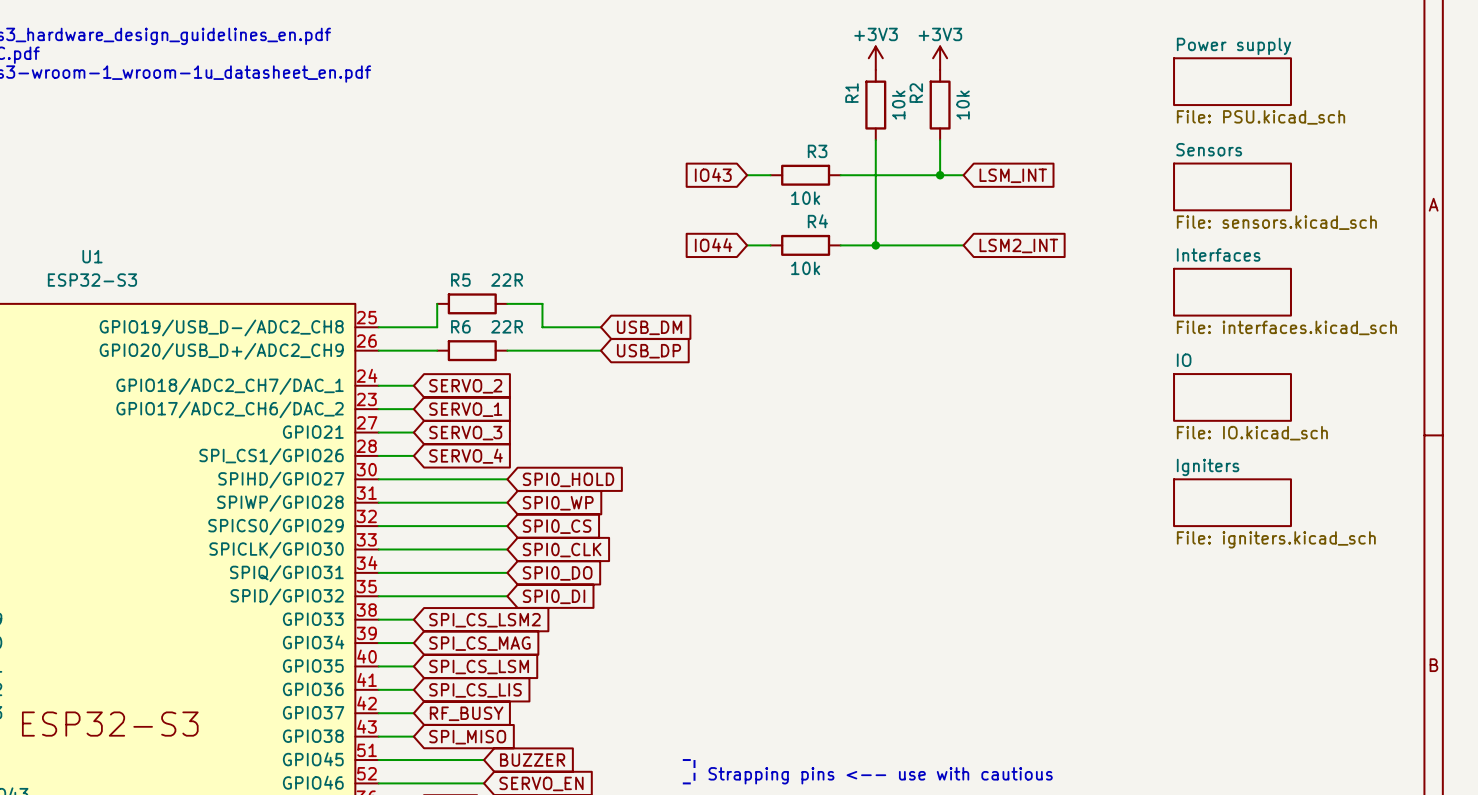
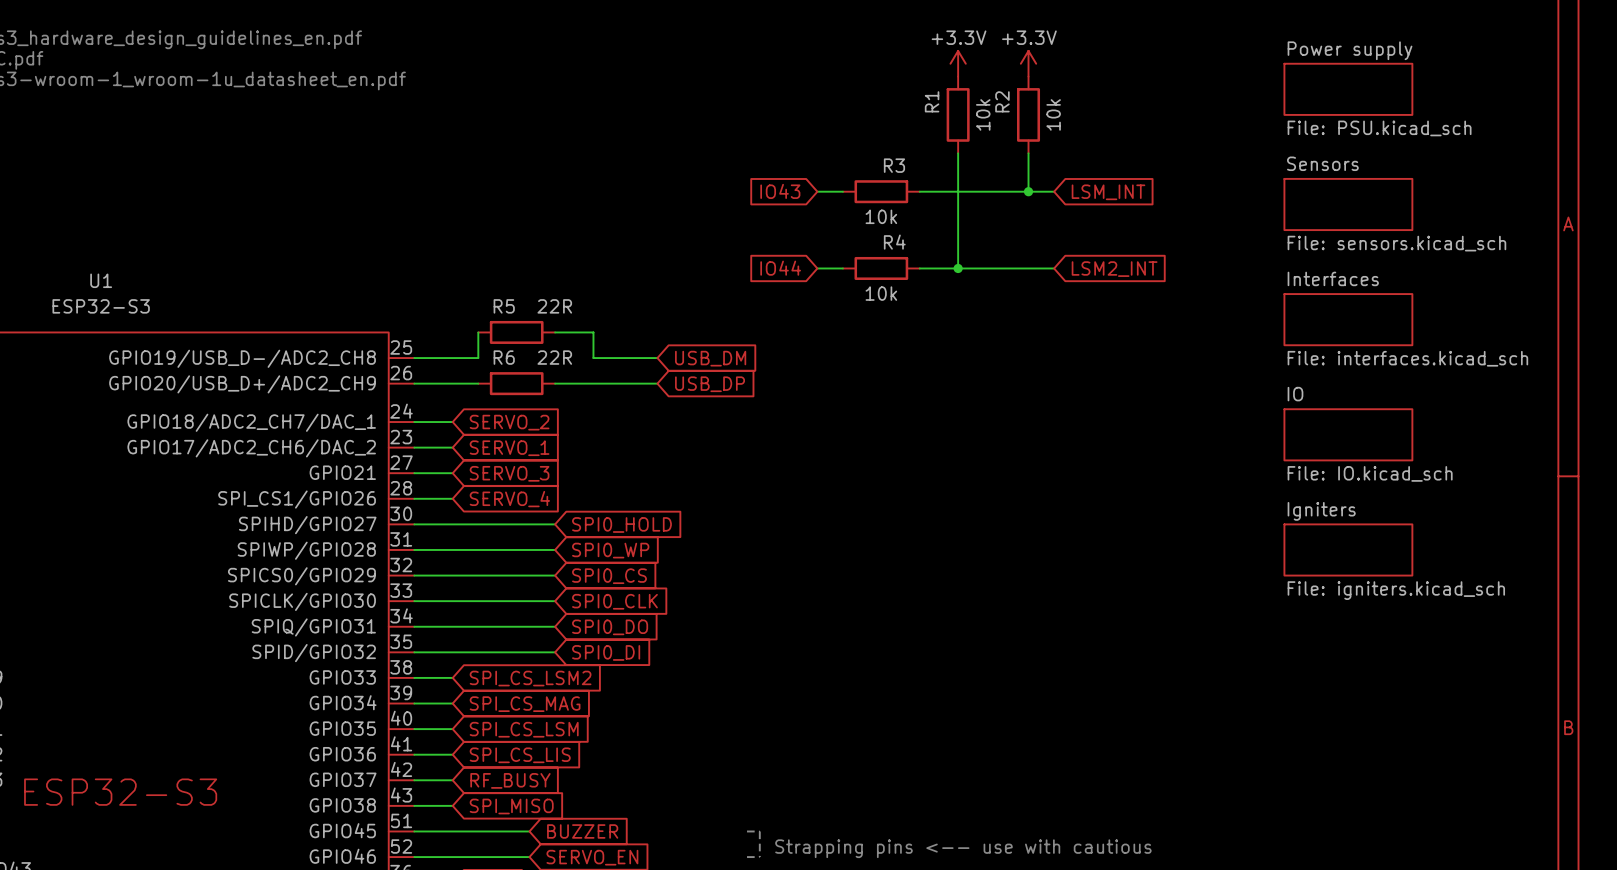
power symbol: +3V3 (875, 58) -> +3.3V (958, 63)
power symbol: +3V3 (940, 58) -> +3.3V (1028, 63)

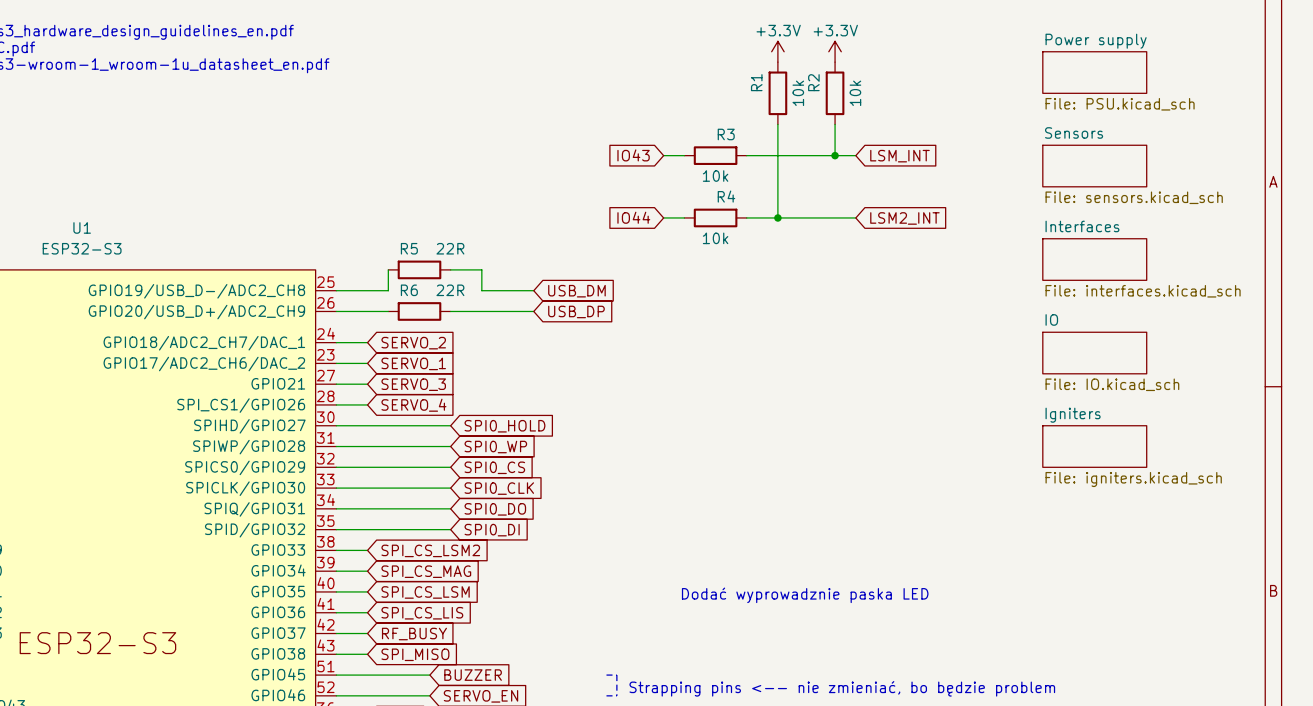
text: none -> Dodać wyprowadznie paska LED (805, 595)
text: Strapping pins <-- use with cautious (963, 848) -> Strapping pins <-- nie zmieniać, bo będzie problem (842, 688)

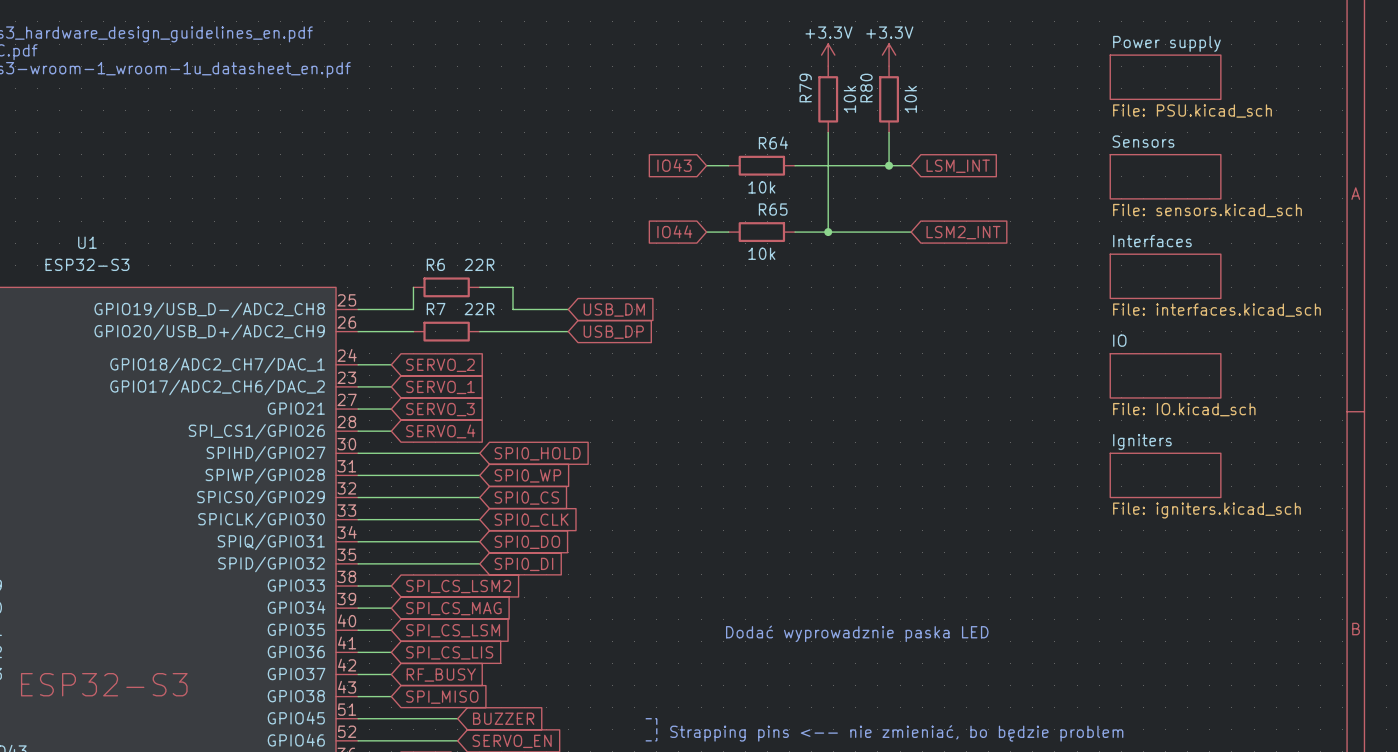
R1 name: R1 (756, 82) -> R79 (805, 88)
R2 name: R2 (813, 82) -> R80 (866, 88)
R3 name: R3 (726, 134) -> R64 (773, 142)
R4 name: R4 (726, 196) -> R65 (773, 209)
R5 name: R5 (409, 248) -> R6 (435, 264)
R6 name: R6 (409, 290) -> R7 (436, 309)

